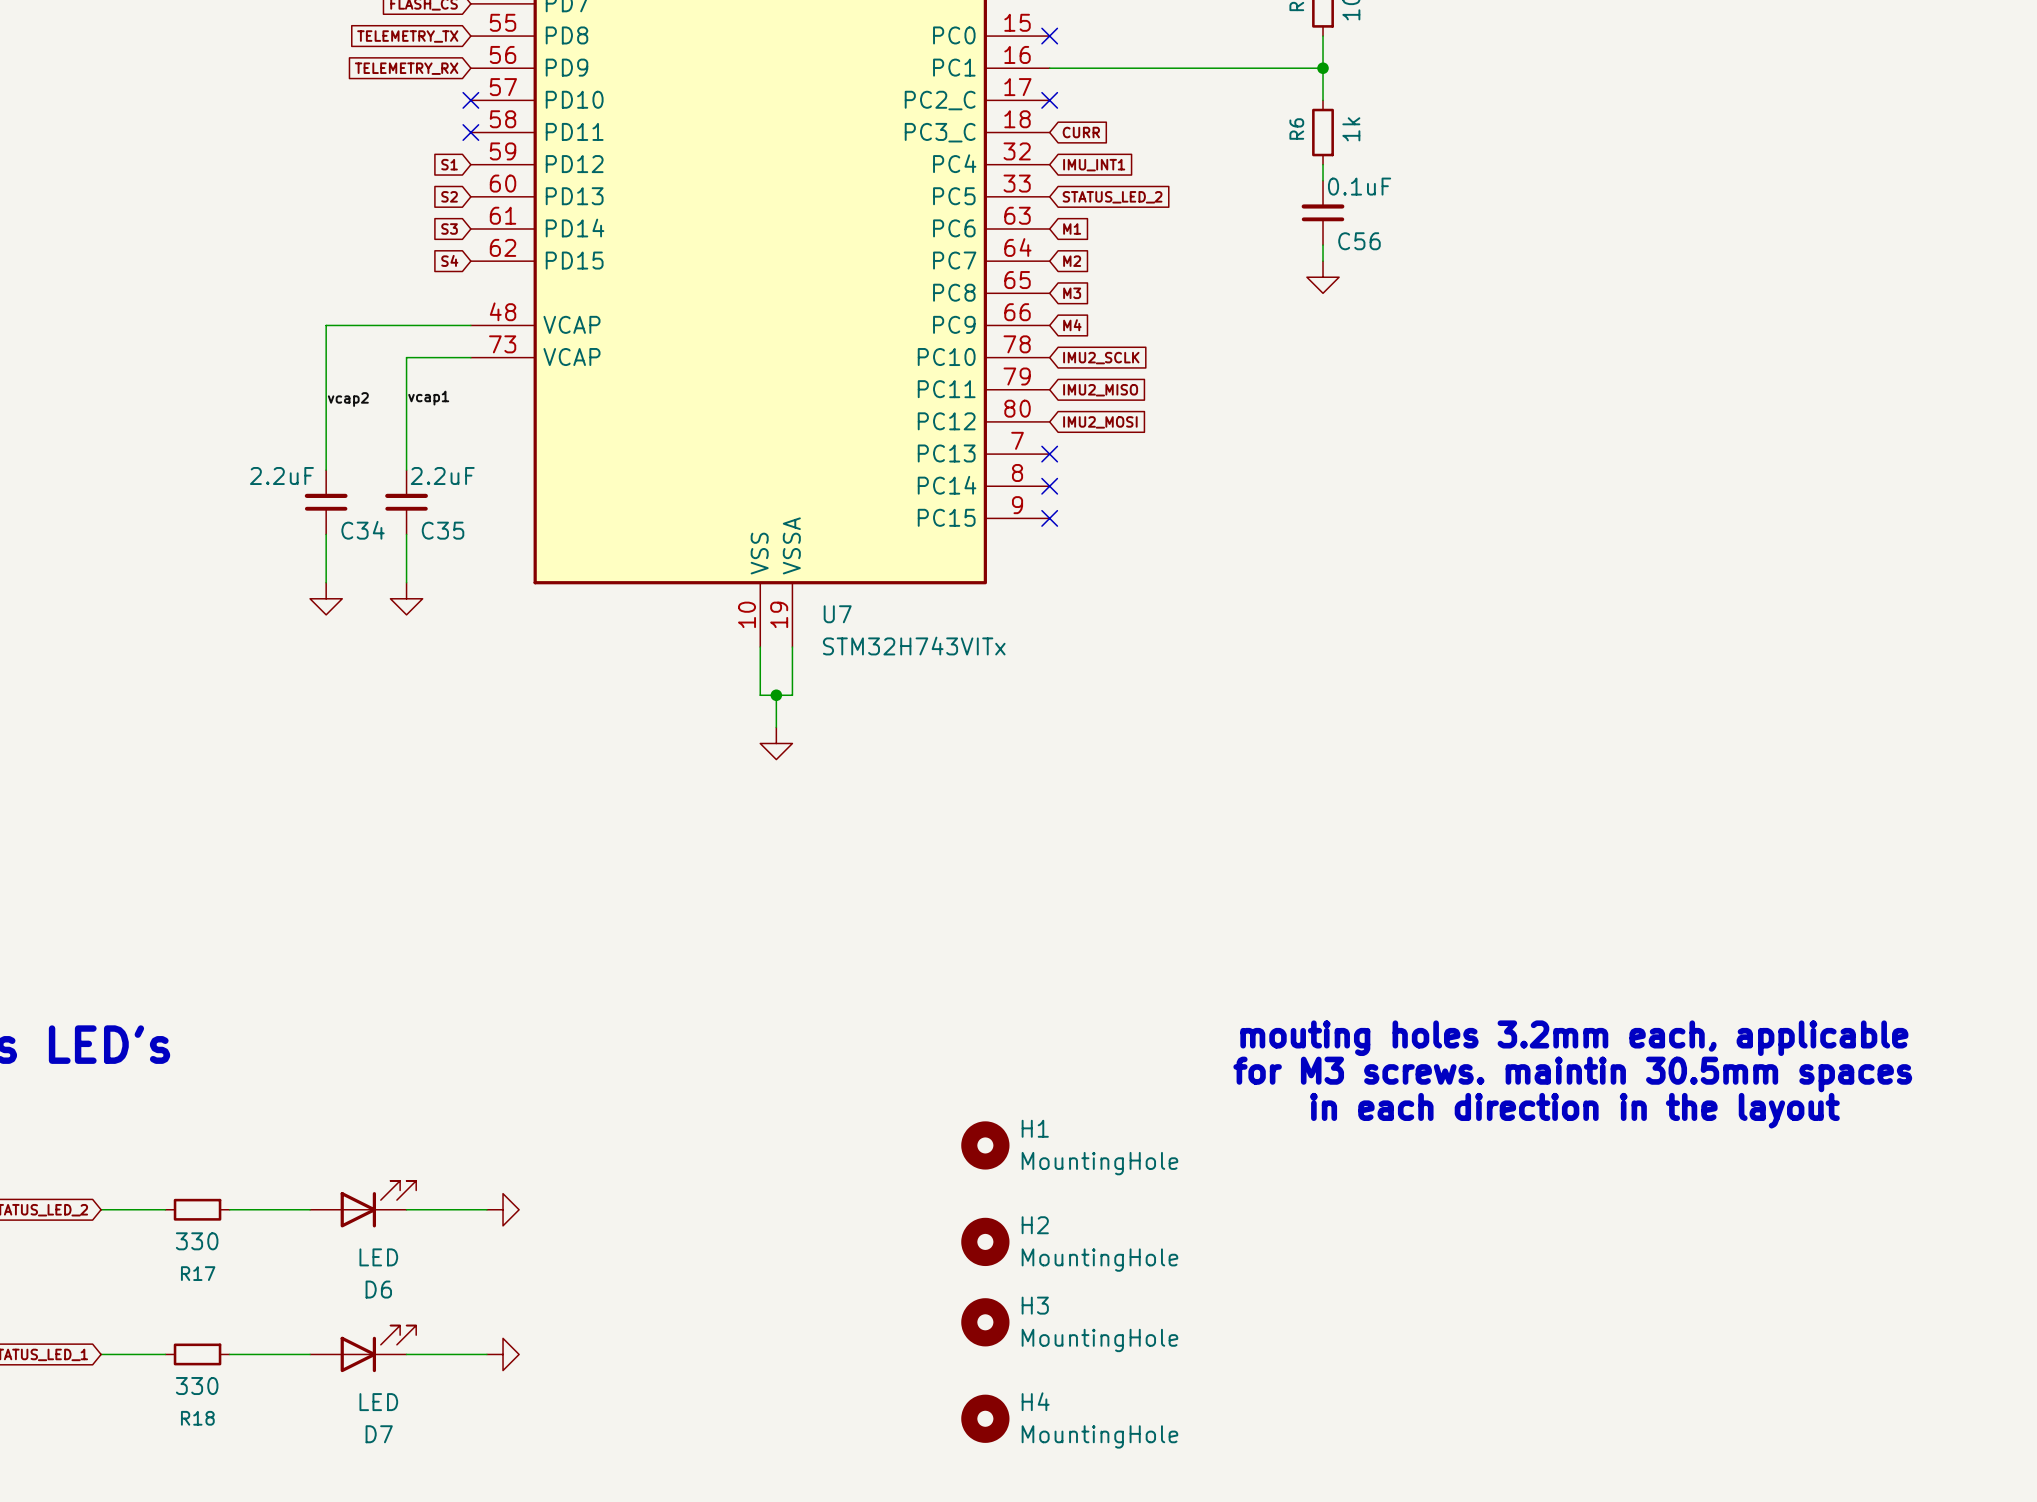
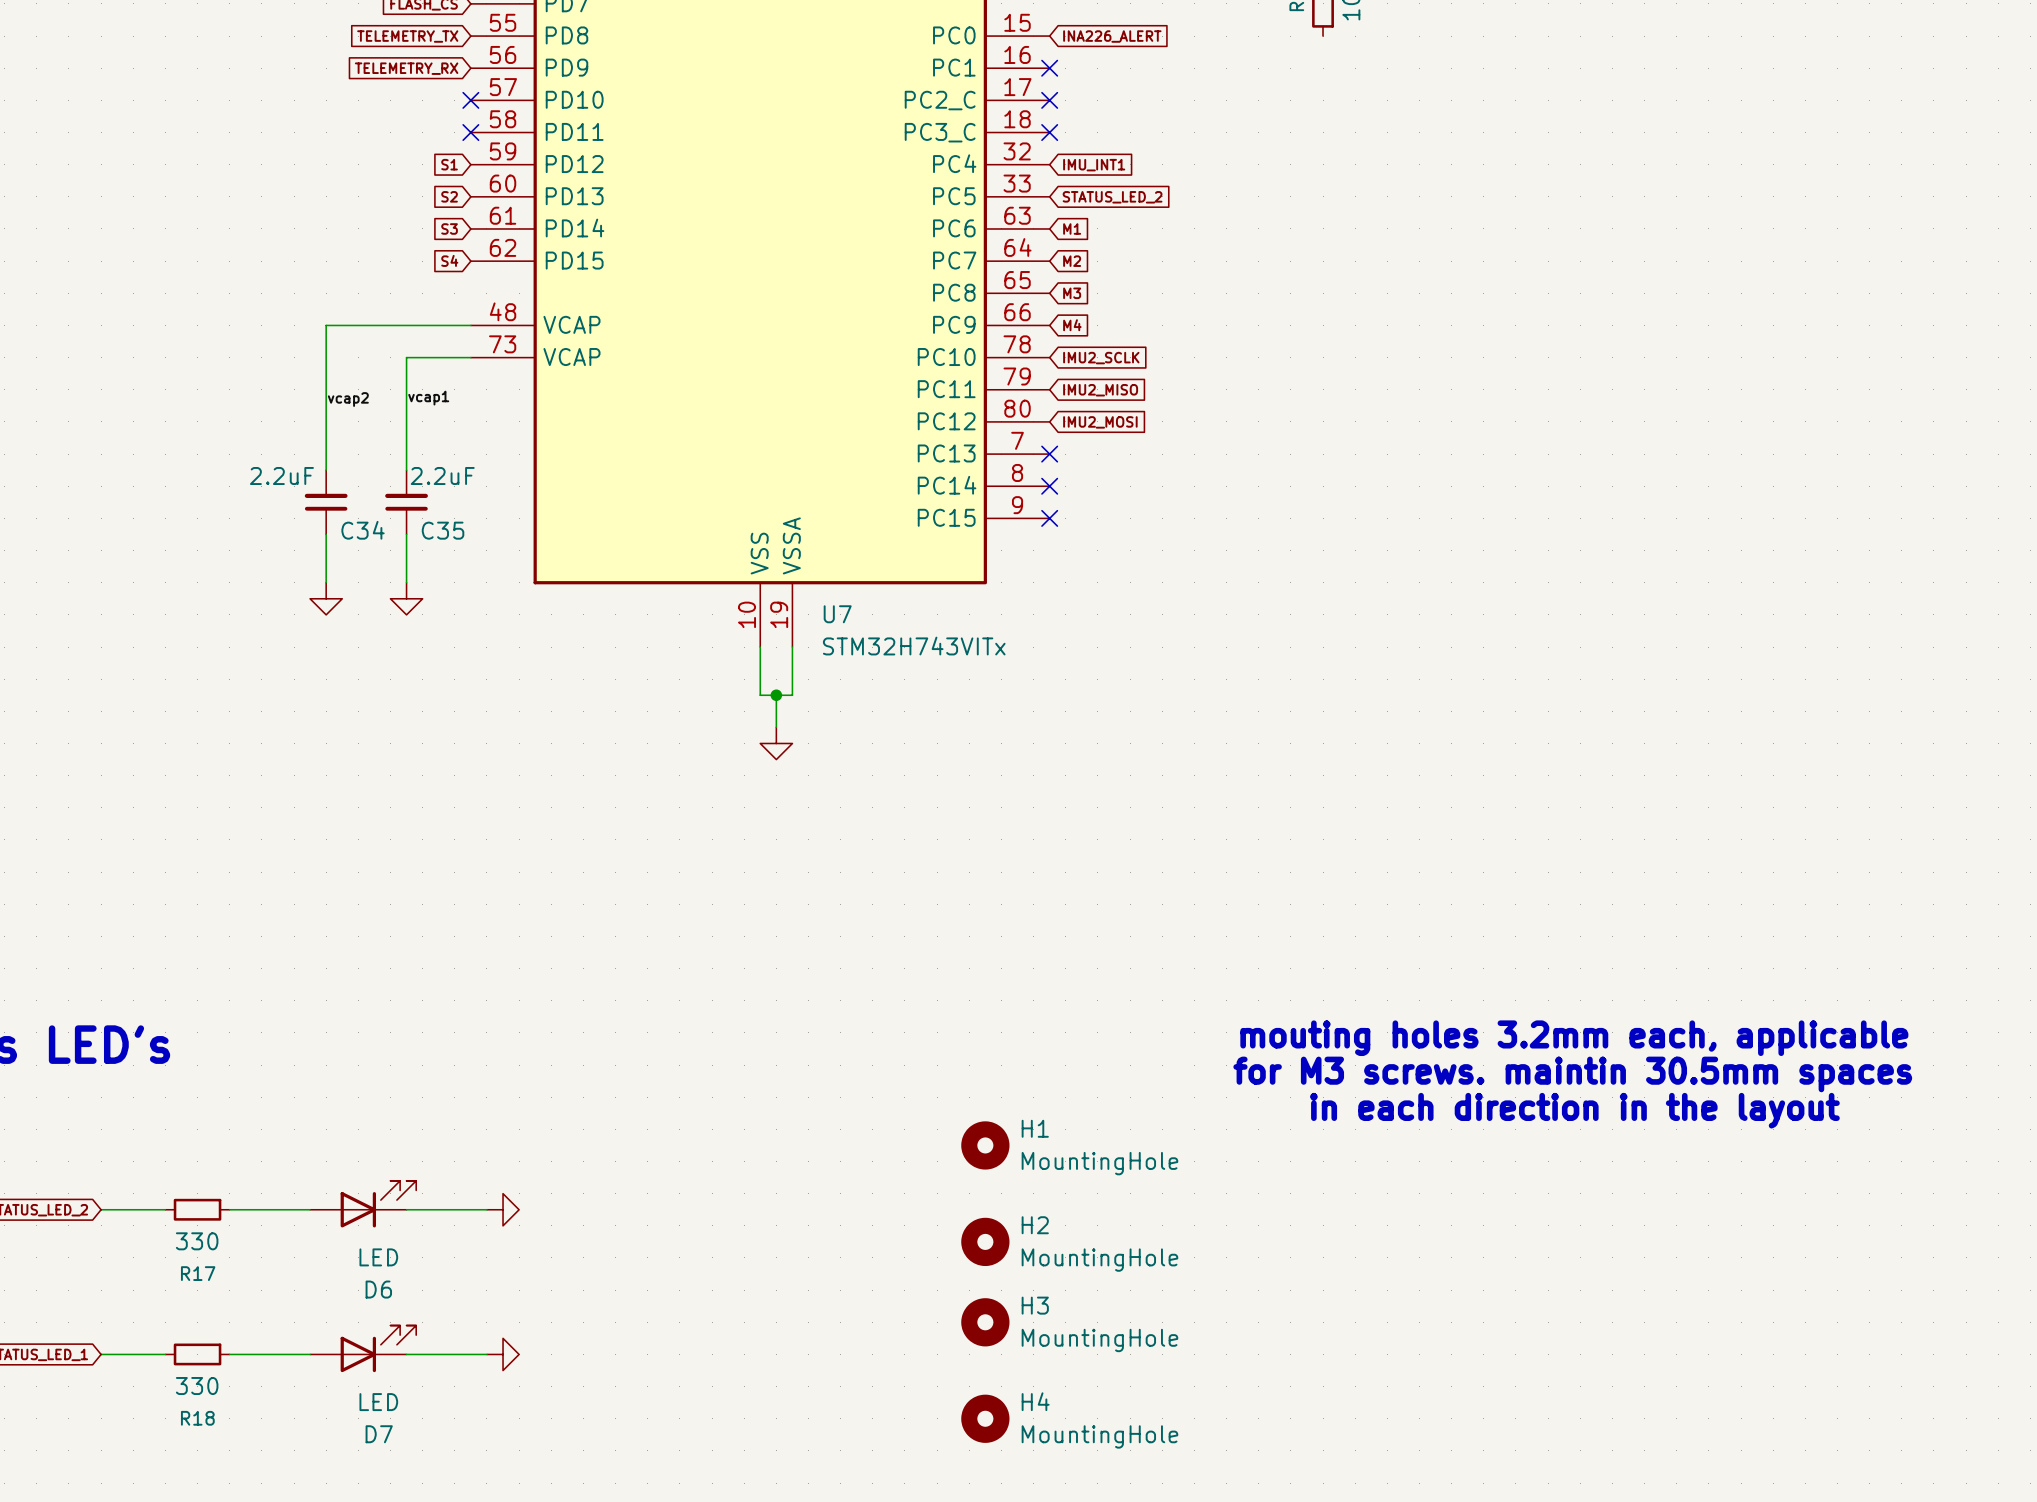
no-connect mark position: (1049, 36) -> (1049, 68)
global label: none -> INA226_ALERT (1112, 36)
wire: (1323, 36) (1323, 100) -> none
wire: (1049, 68) (1323, 68) -> none
junction: (1323, 68) -> none
no-connect mark: none -> (1049, 132)
global label: CURR (1081, 132) -> none
R6: 1k (1323, 132) -> none
wire: (1323, 164) (1323, 180) -> none
C56: 0.1uF (1323, 212) -> none
wire: (1323, 245) (1323, 261) -> none
power symbol: (1323, 277) -> none

